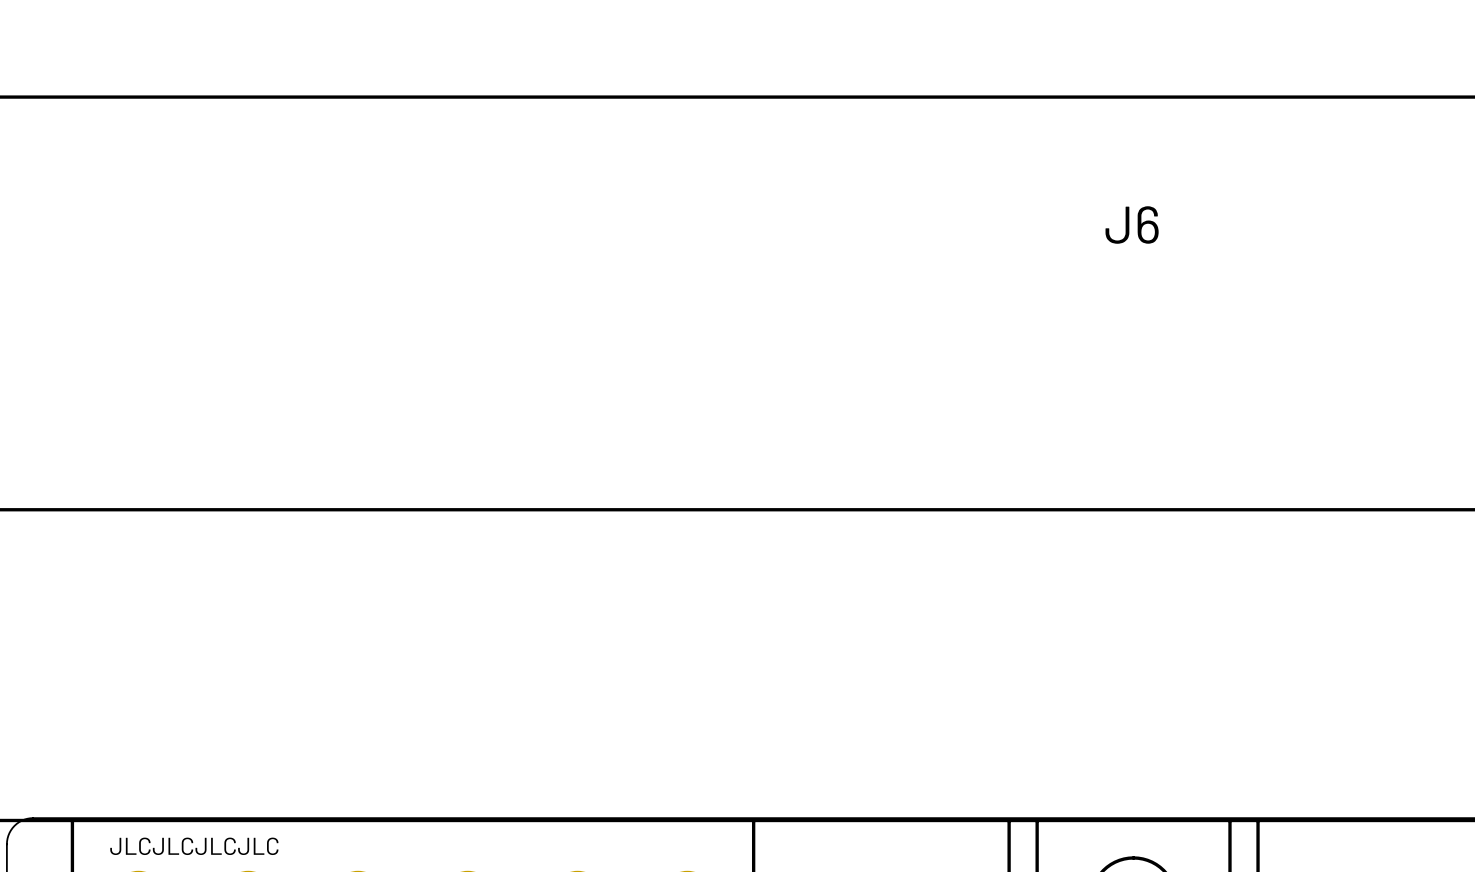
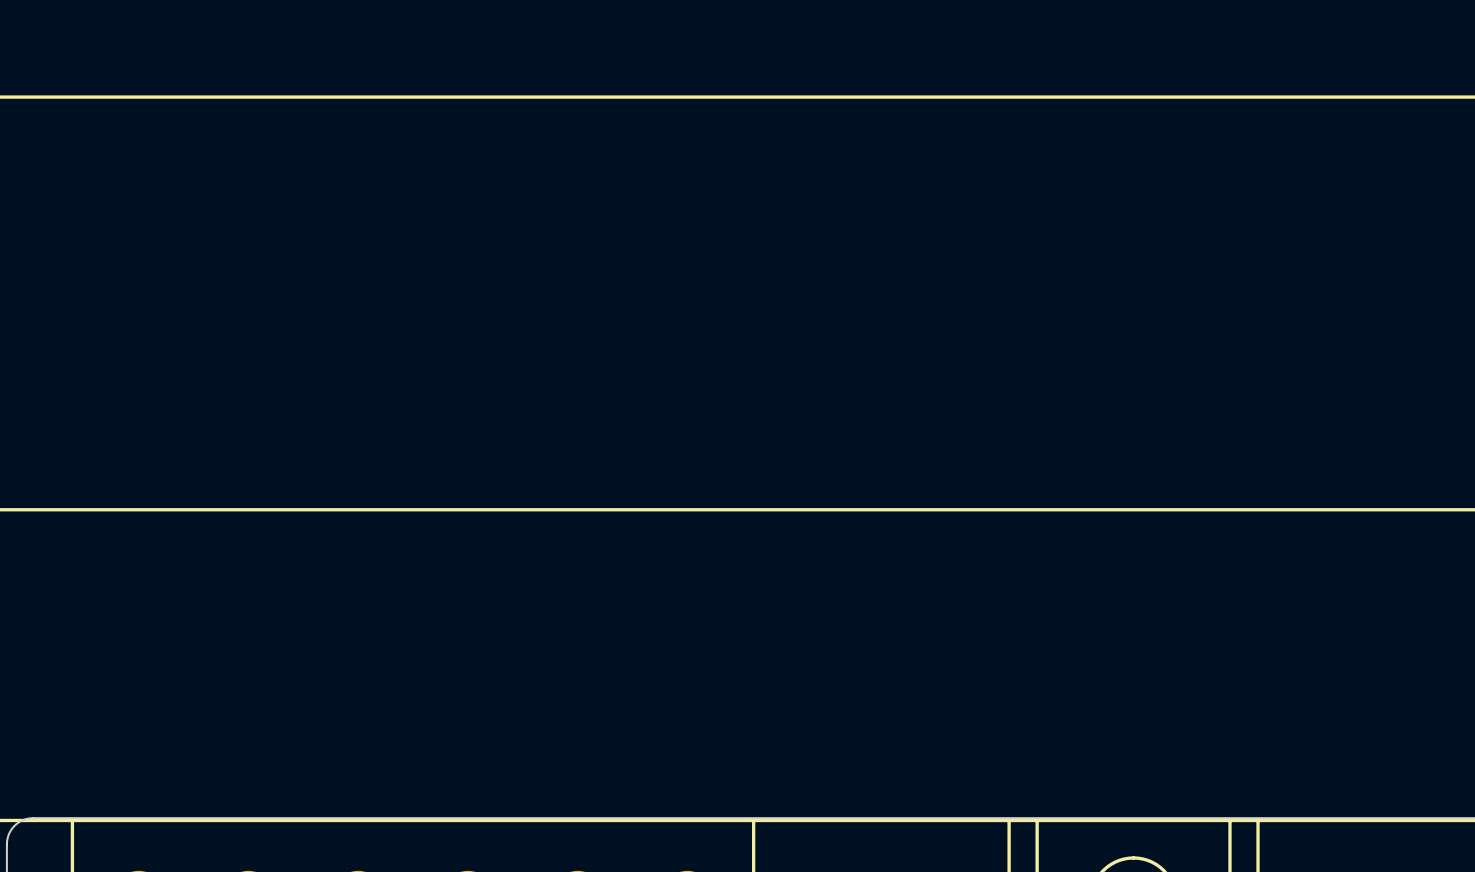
J6 name: J6 (1132, 225) -> none
text: JLCJLCJLCJLC (194, 846) -> none

